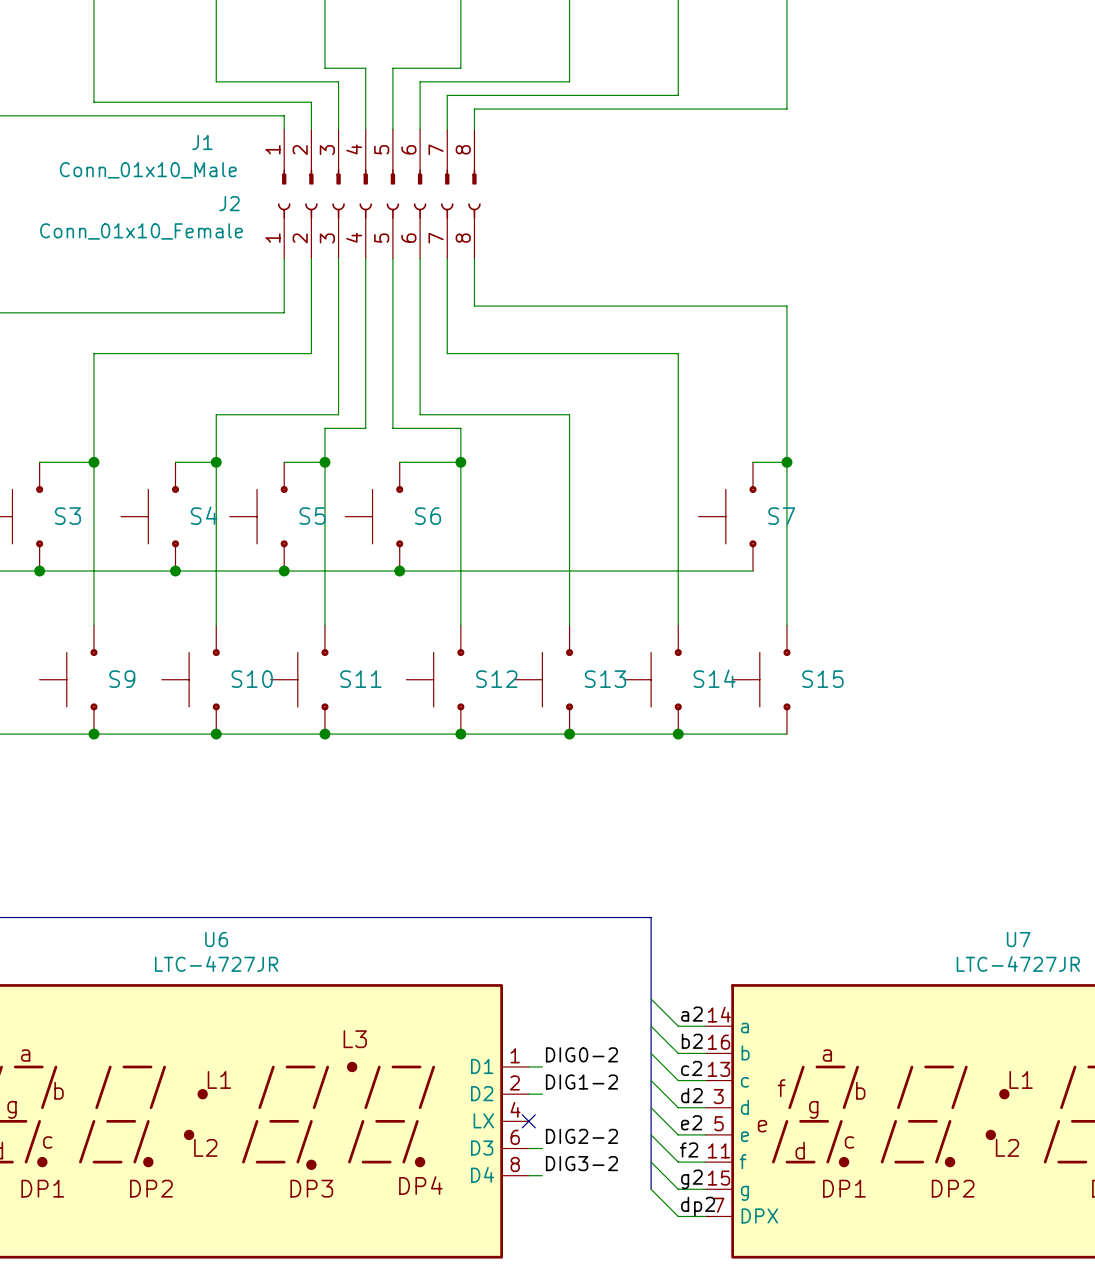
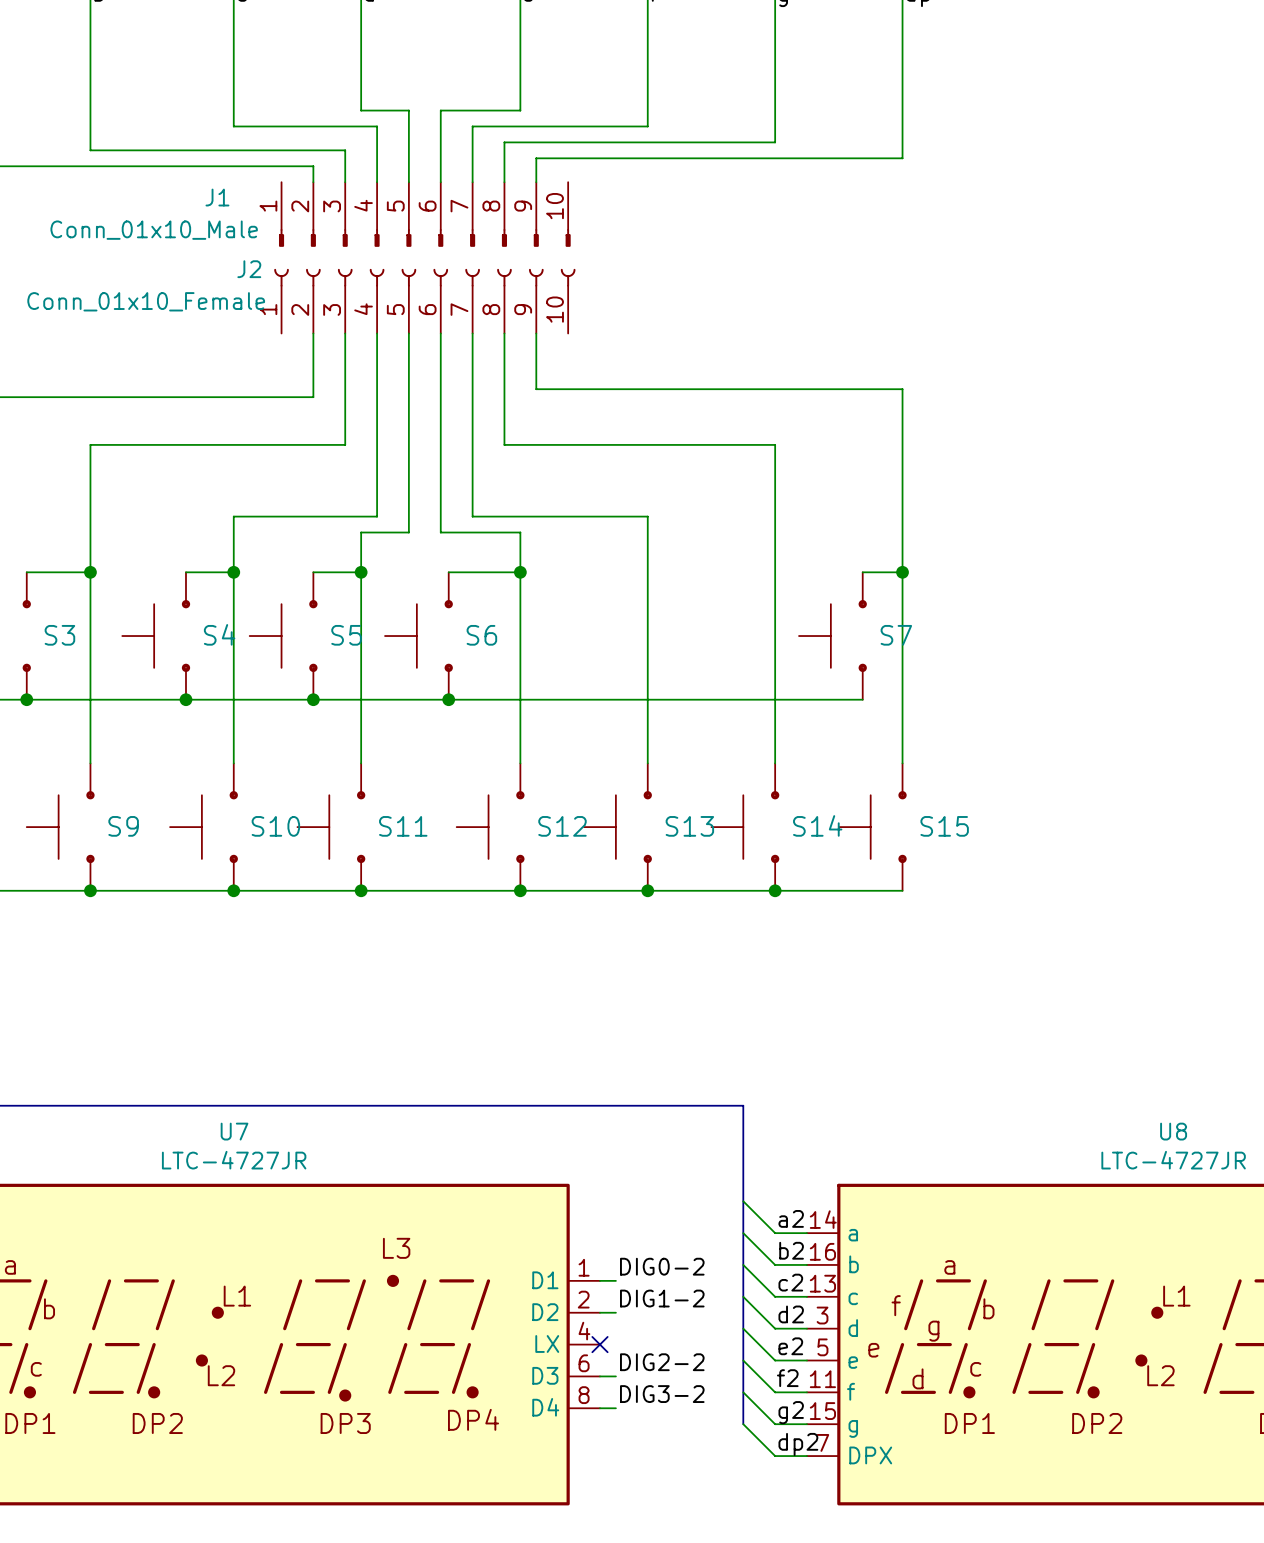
J1 symbol: [282, 129, 477, 185] -> [278, 182, 571, 247]
J2 symbol: [277, 203, 481, 259] -> [274, 268, 576, 334]
U6 name: U6 (216, 939) -> U7 (234, 1131)
U7 name: U7 (1018, 939) -> U8 (1173, 1131)

